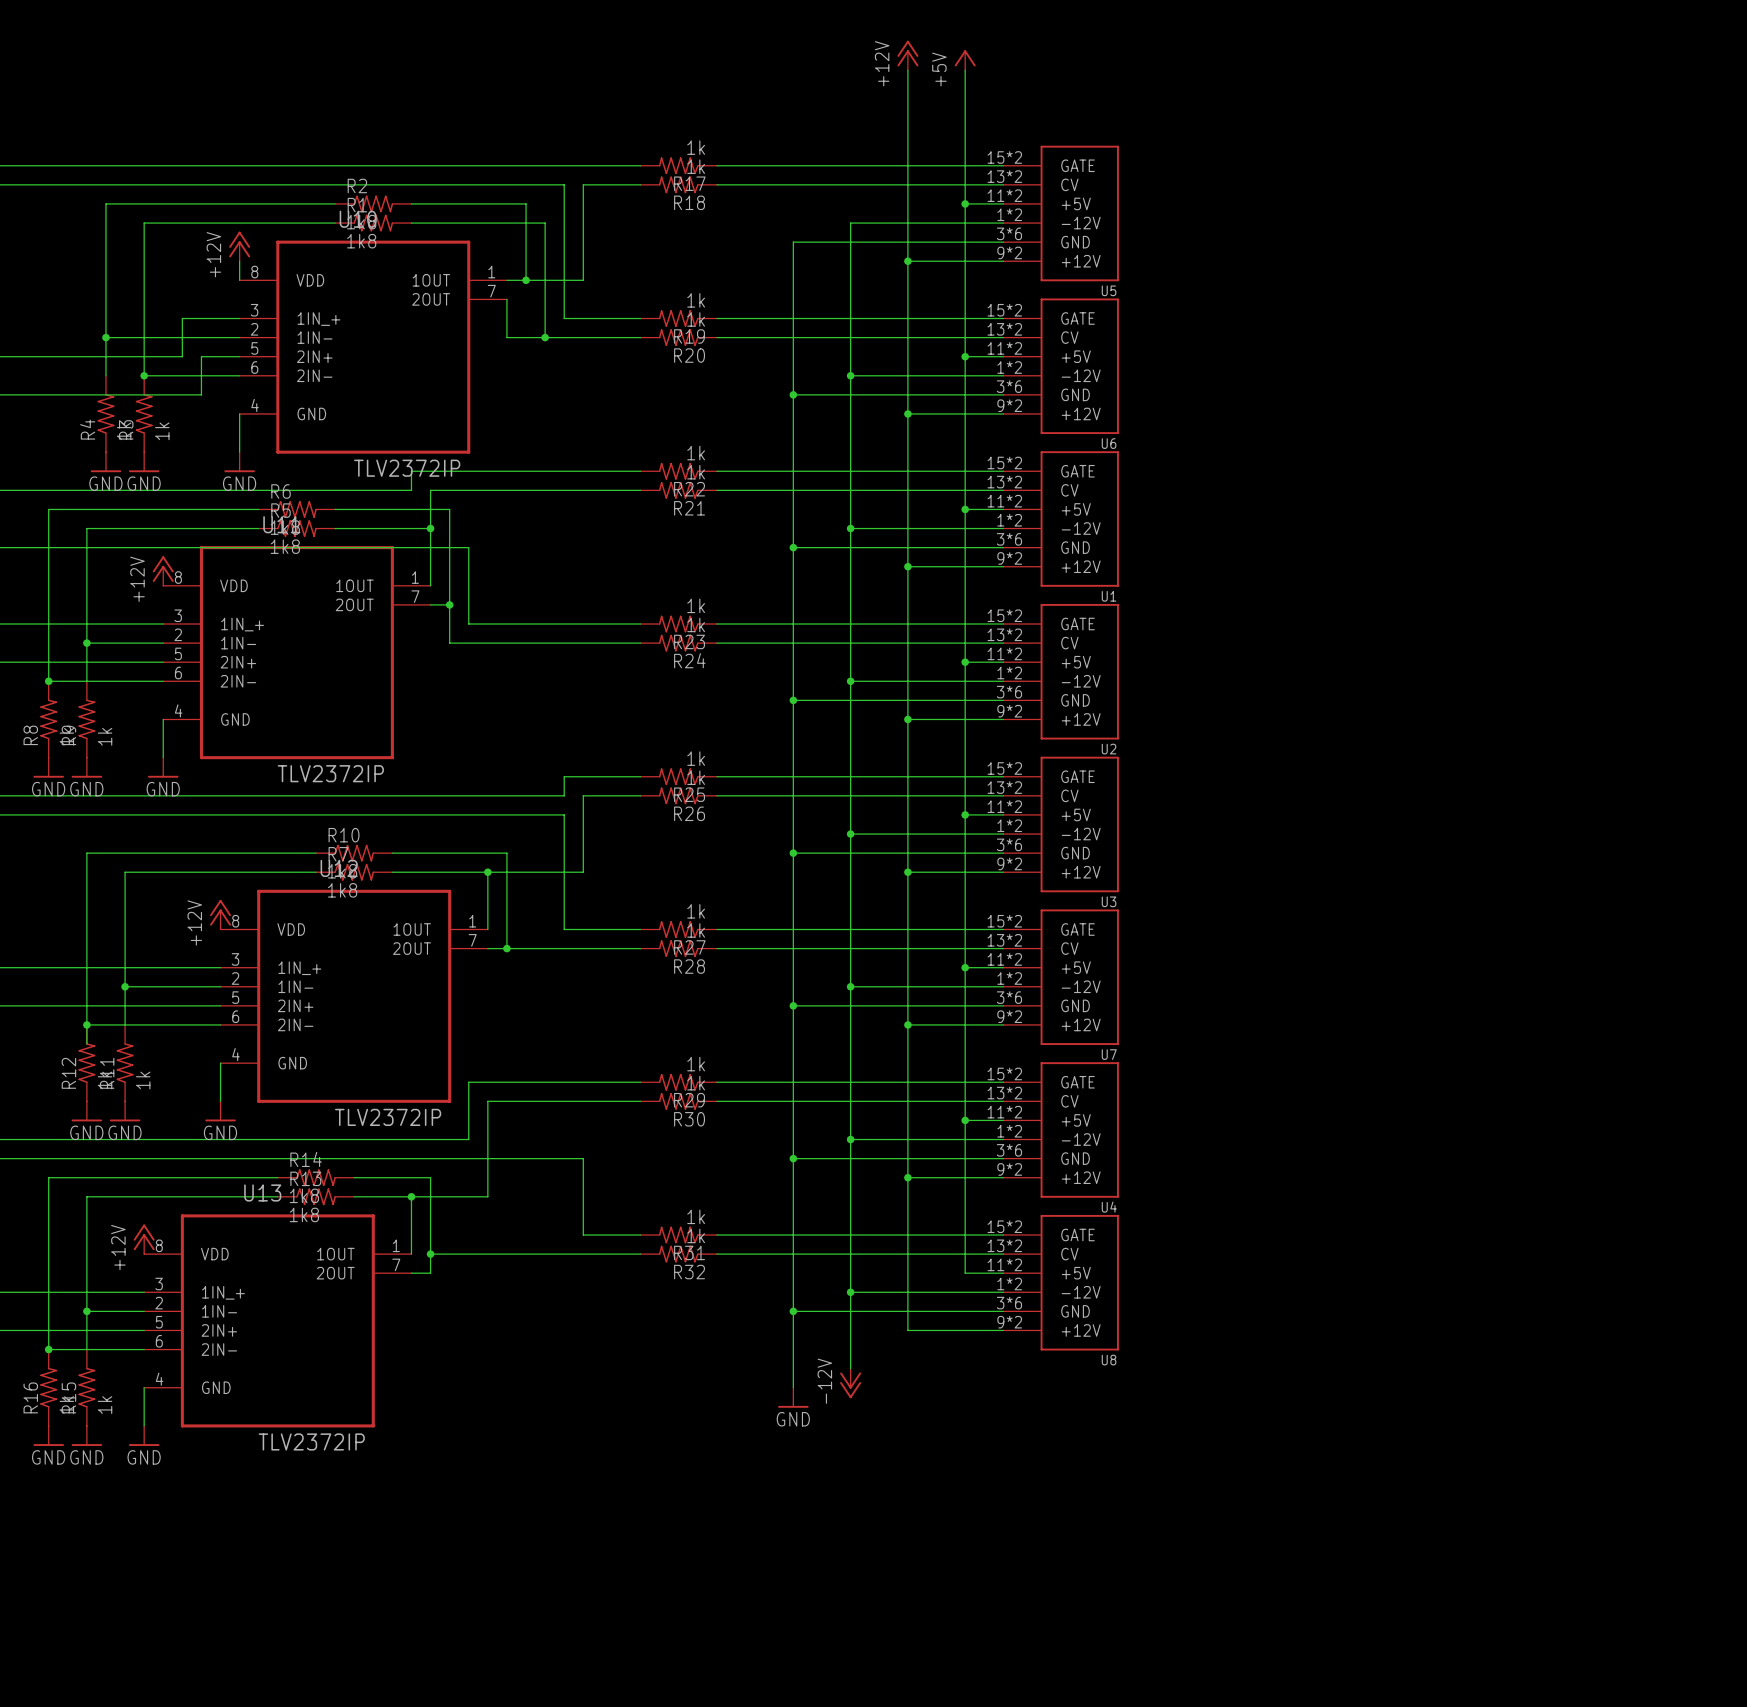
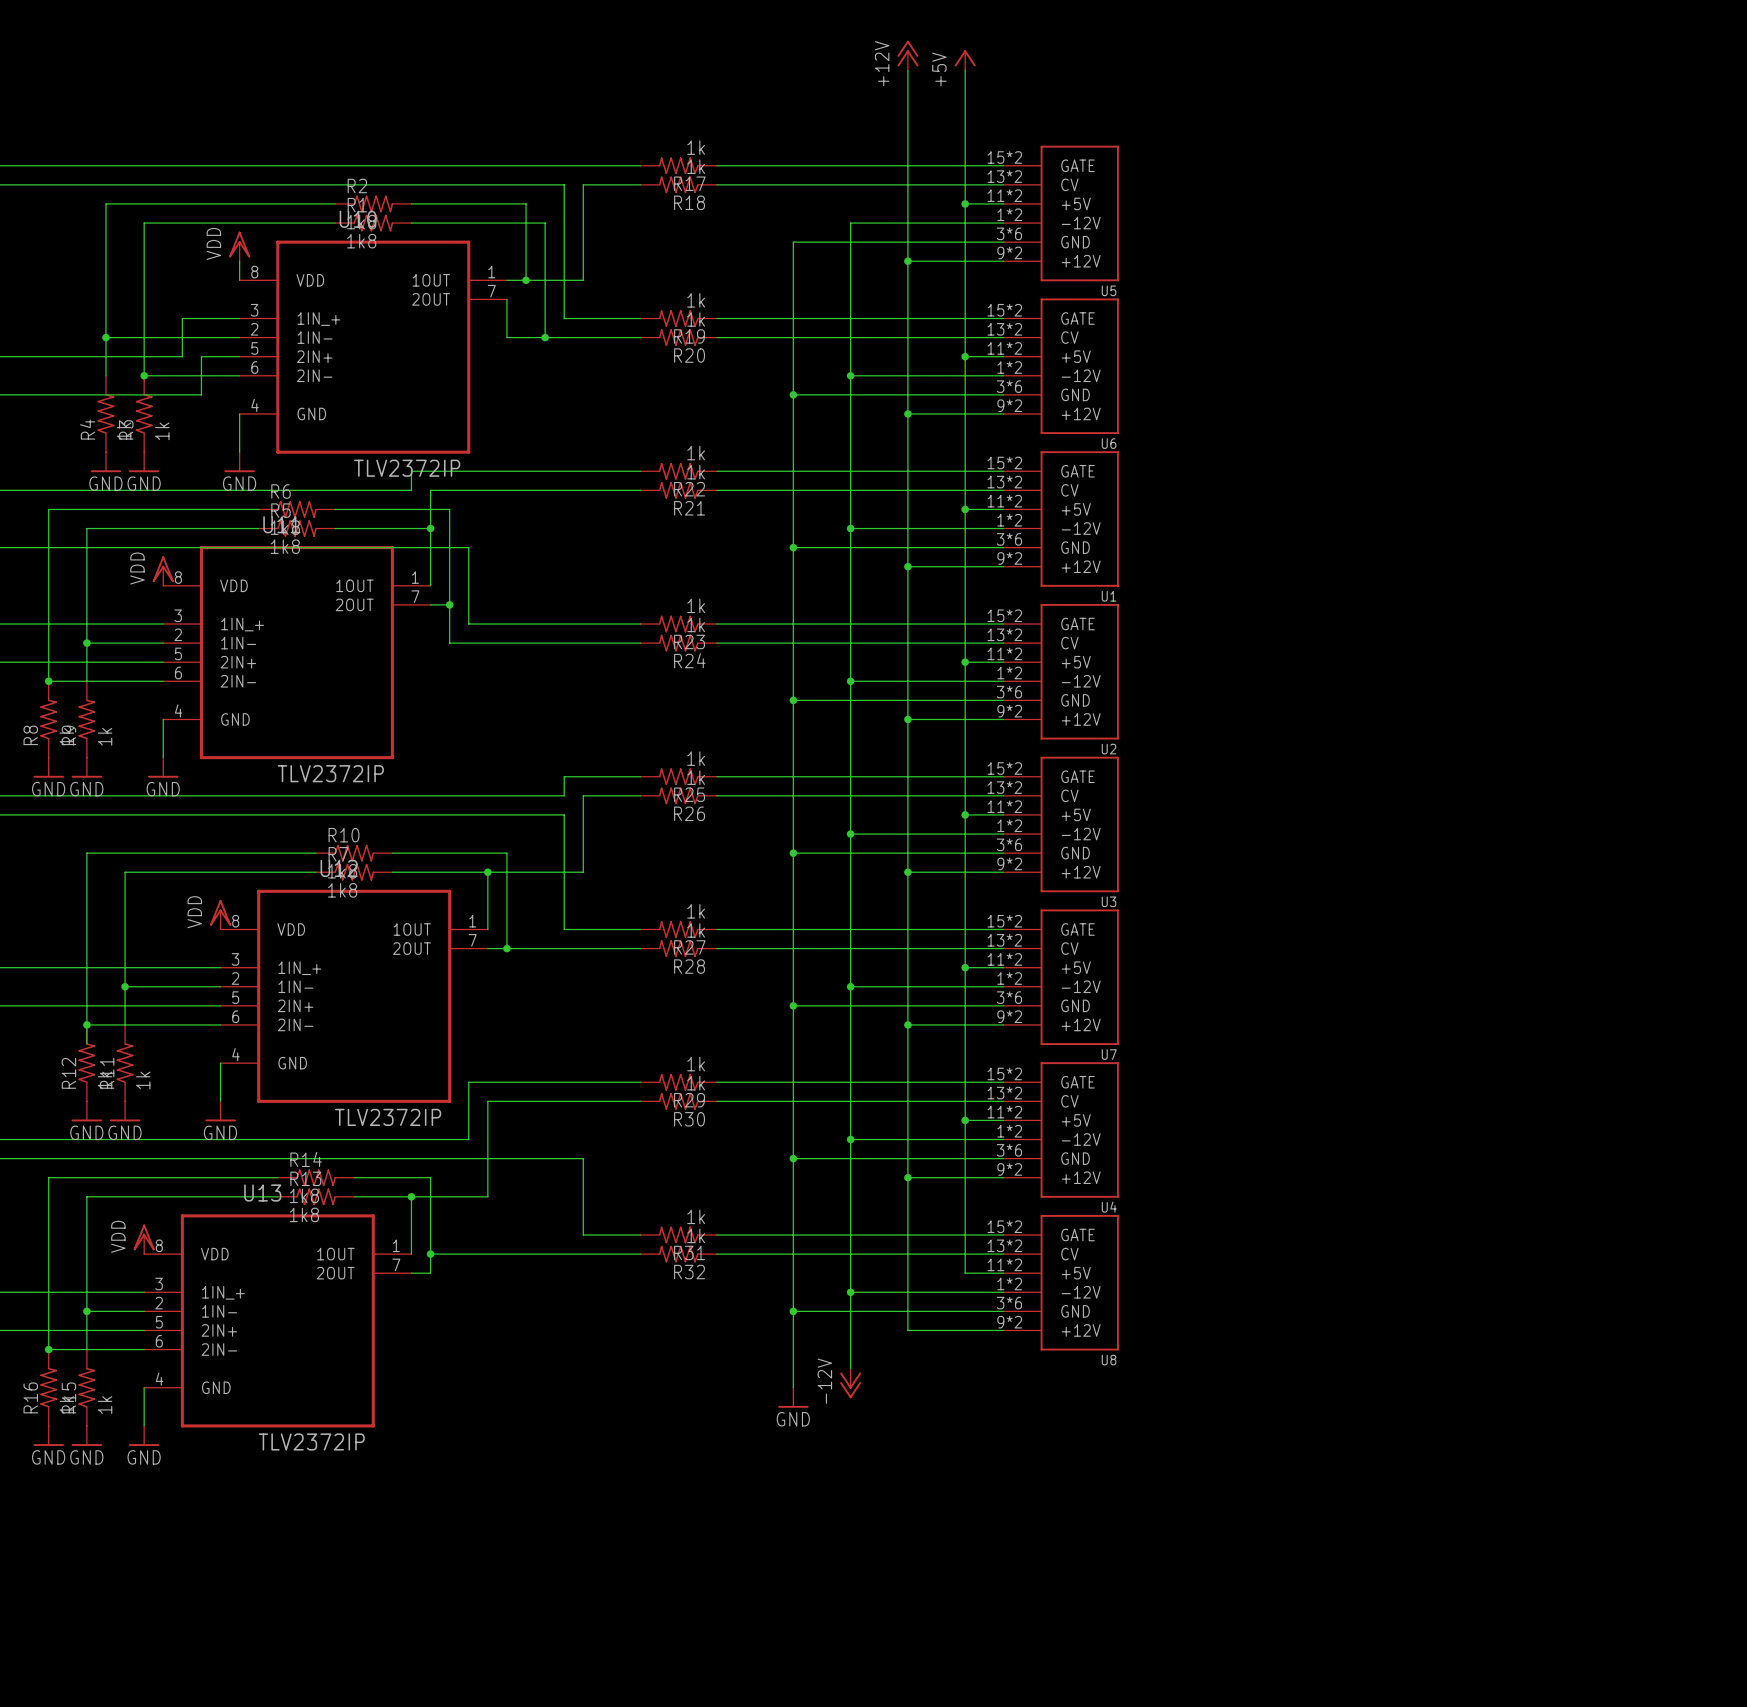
power symbol: +12V (239, 246) -> VDD (239, 246)
power symbol: +12V (163, 571) -> VDD (163, 571)
power symbol: +12V (220, 914) -> VDD (220, 914)
power symbol: +12V (144, 1239) -> VDD (144, 1239)

